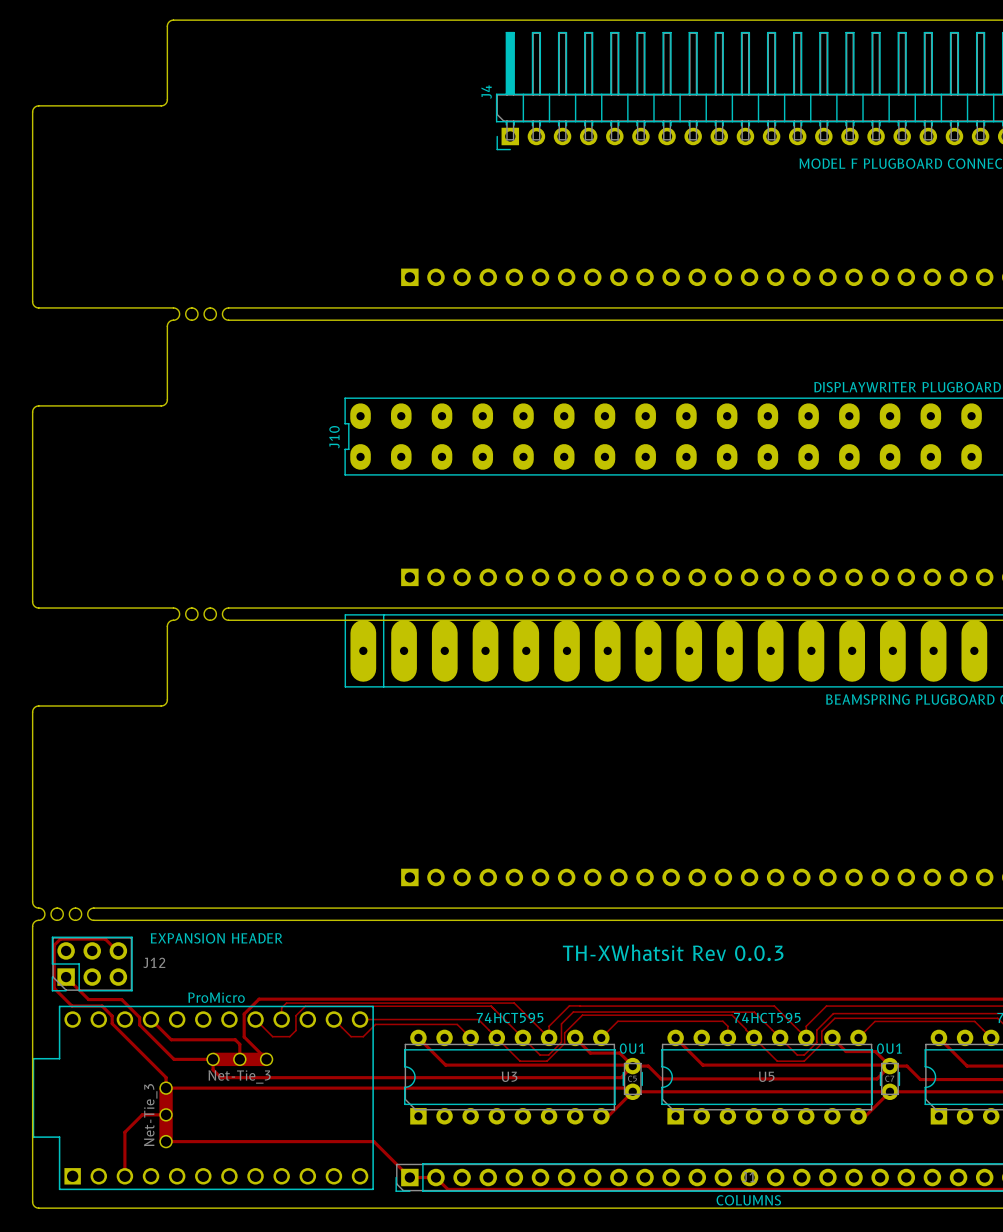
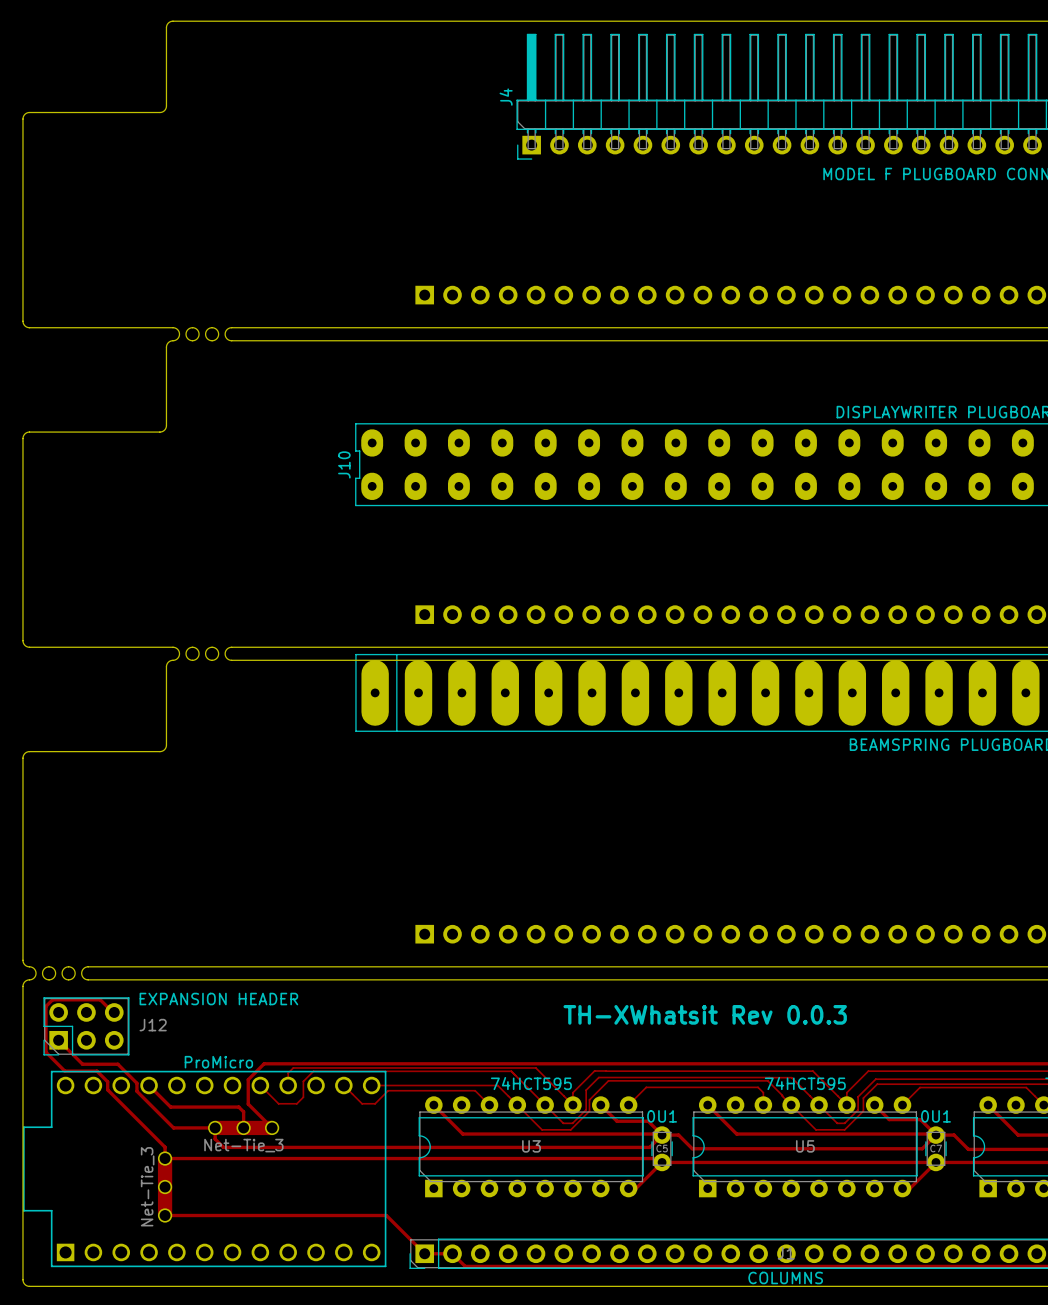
track: (166, 1114) (142, 1114) (124, 1132) (124, 1176) -> none

